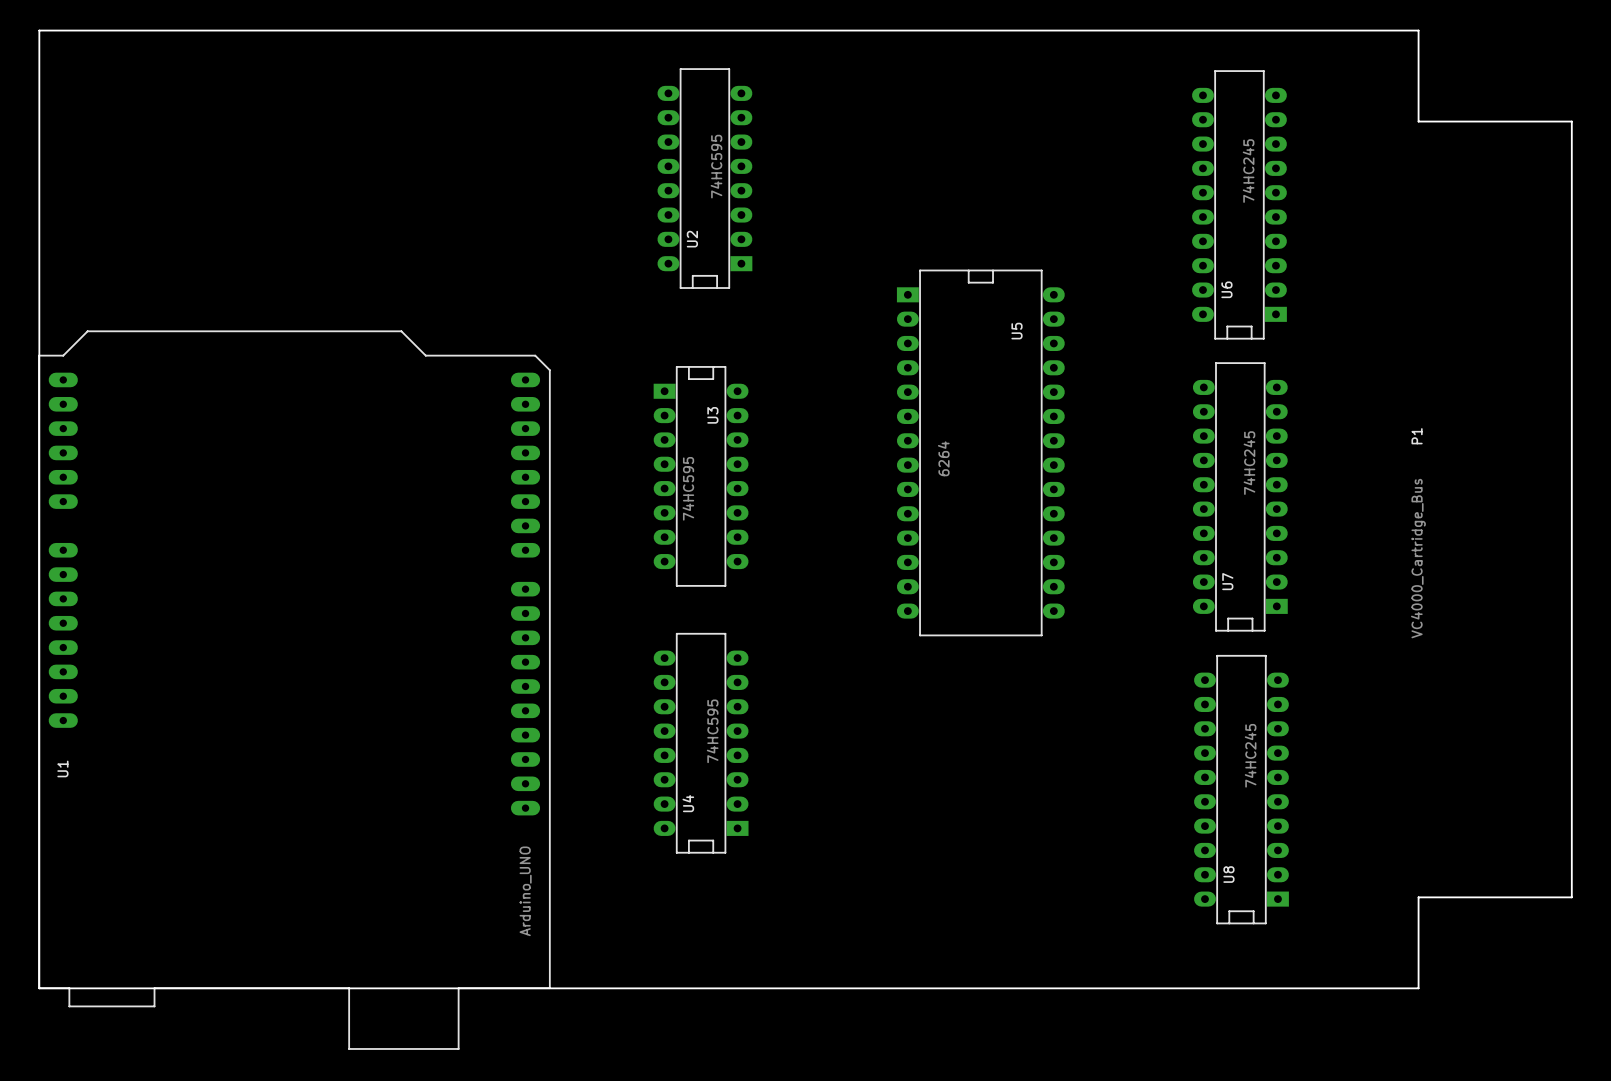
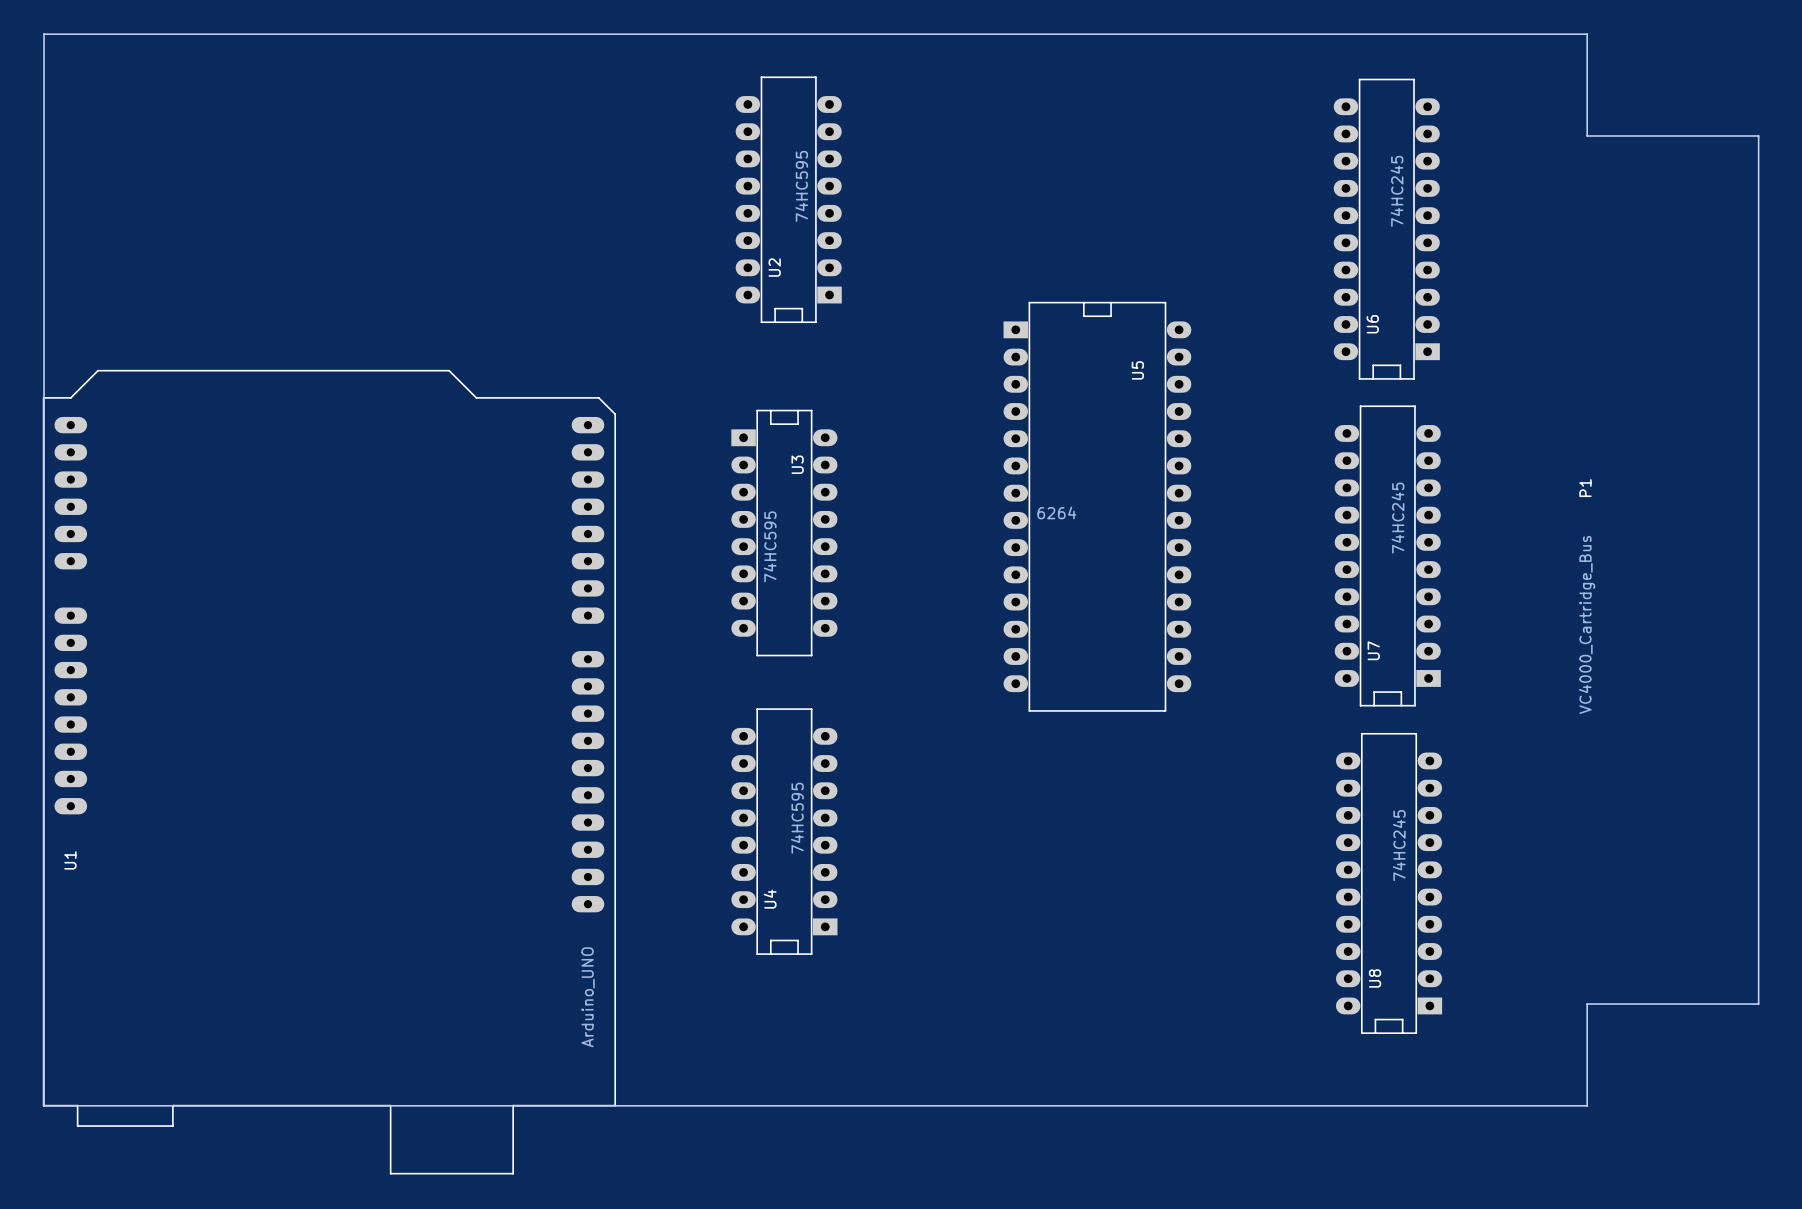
U5 value rotation: 0° (943, 458) -> 90° clockwise (1056, 512)

